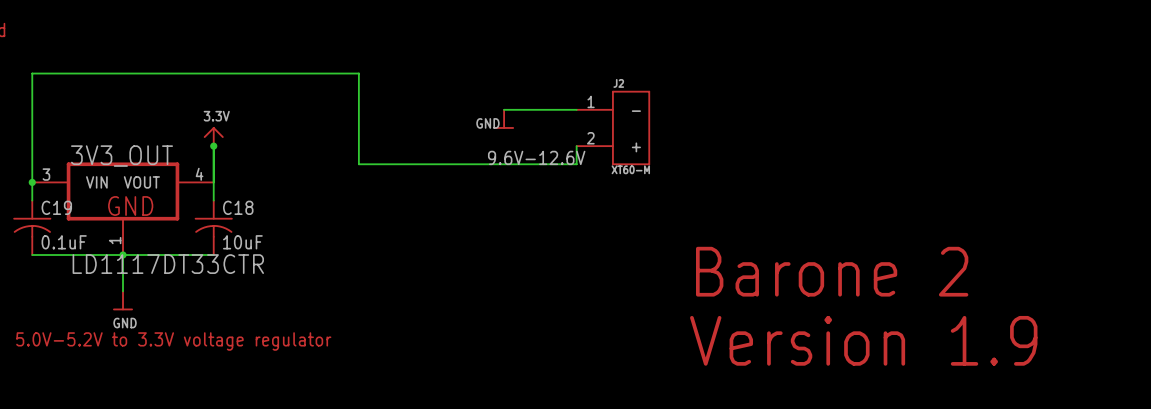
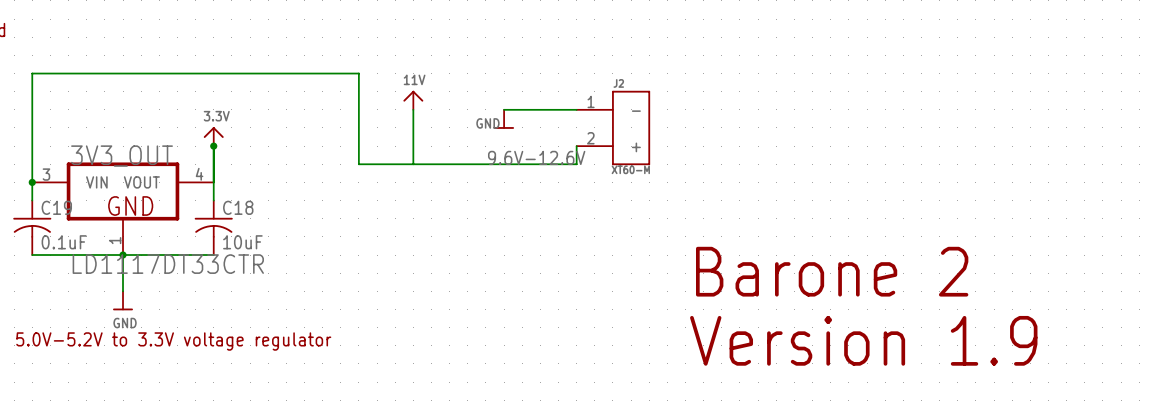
power symbol: none -> 11V (413, 100)
wire: none -> (413, 109) (413, 164)

